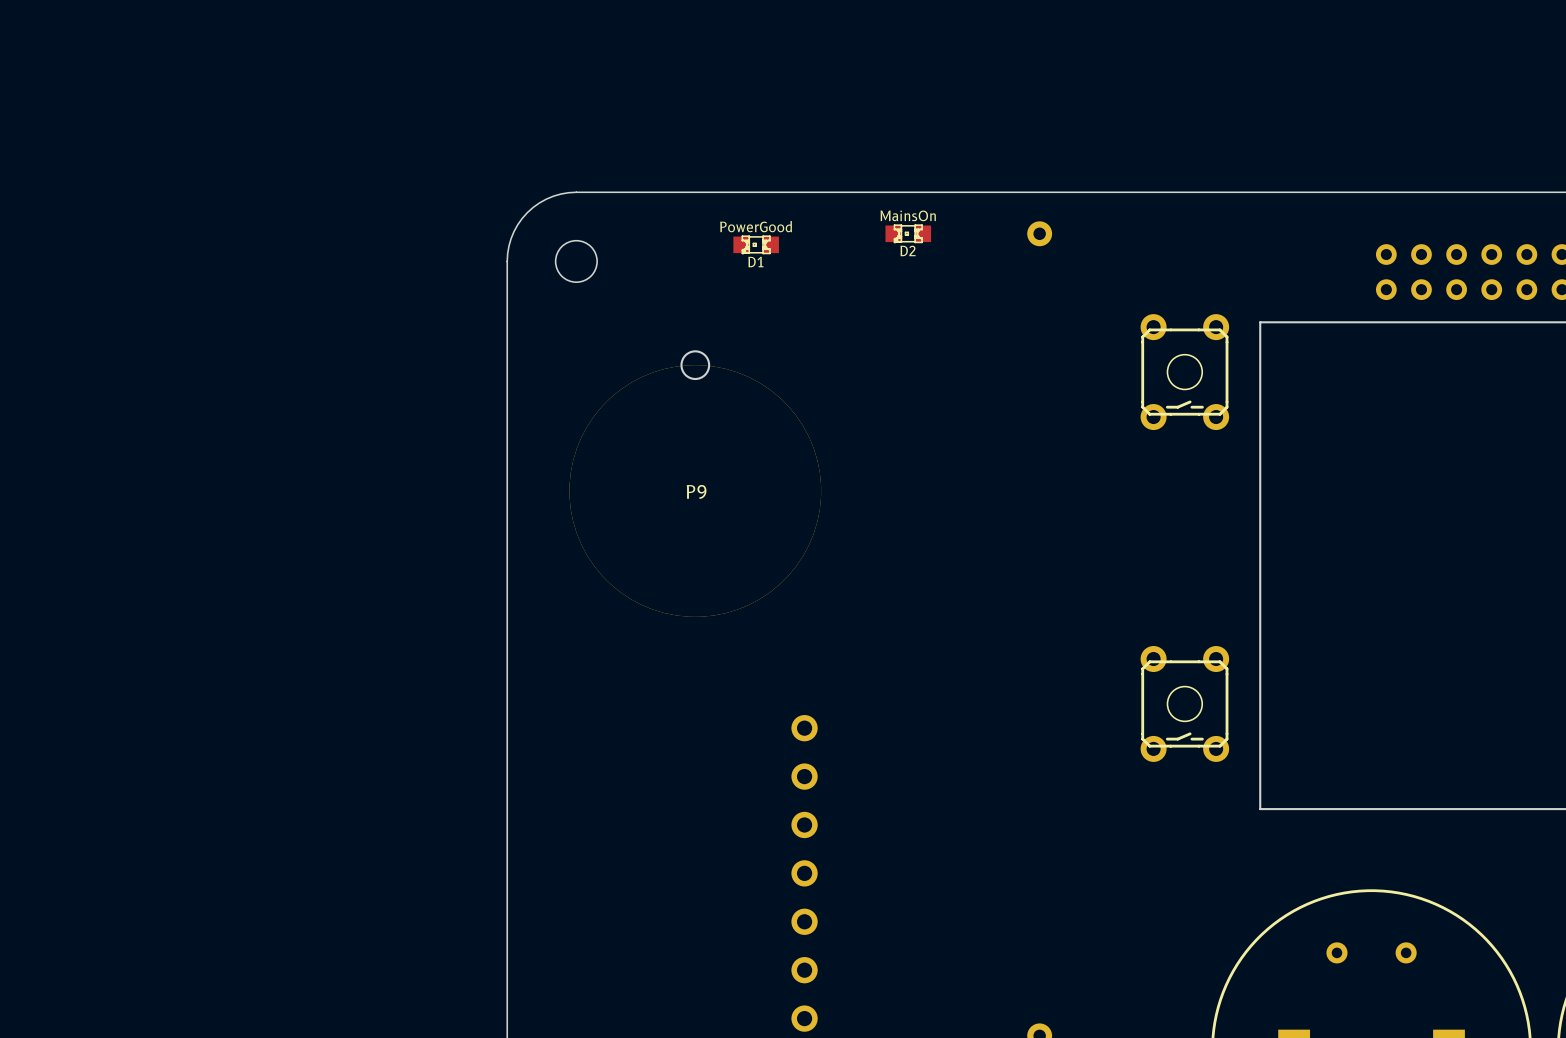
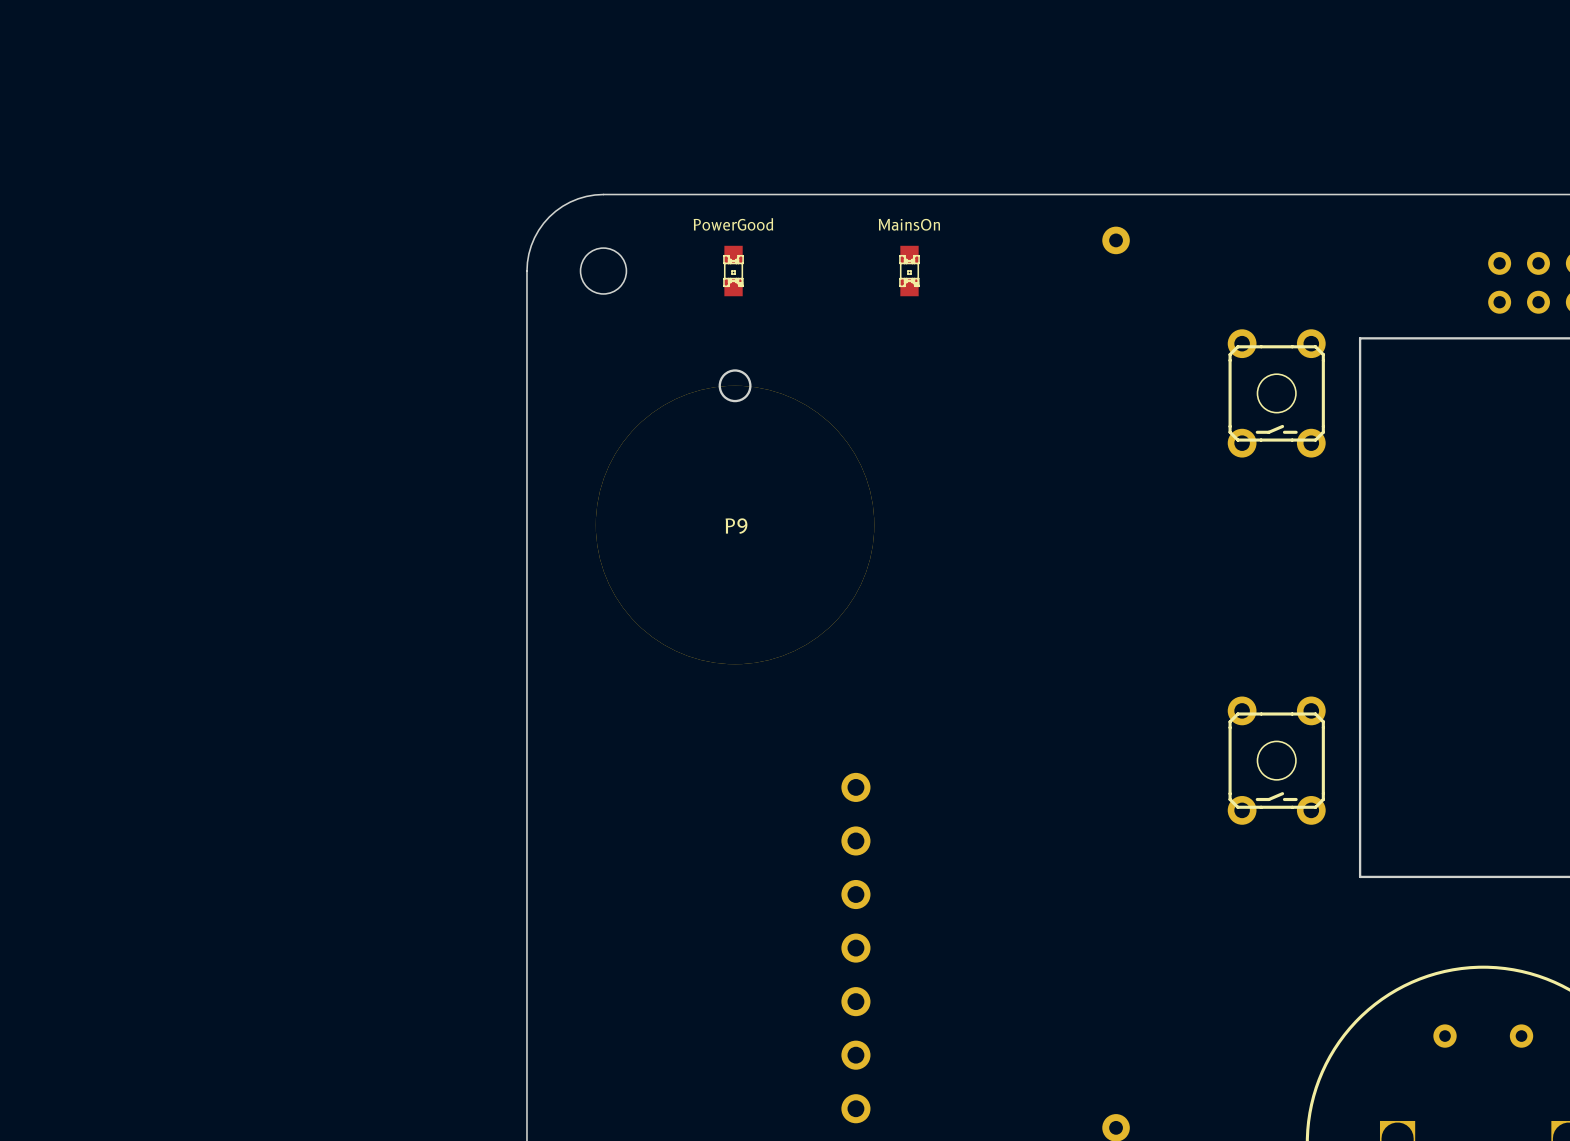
D2: MainsOn (908, 233) -> none
D1: PowerGood (756, 244) -> none
part: none -> PowerGood (733, 271)
part: none -> MainsOn (909, 271)

